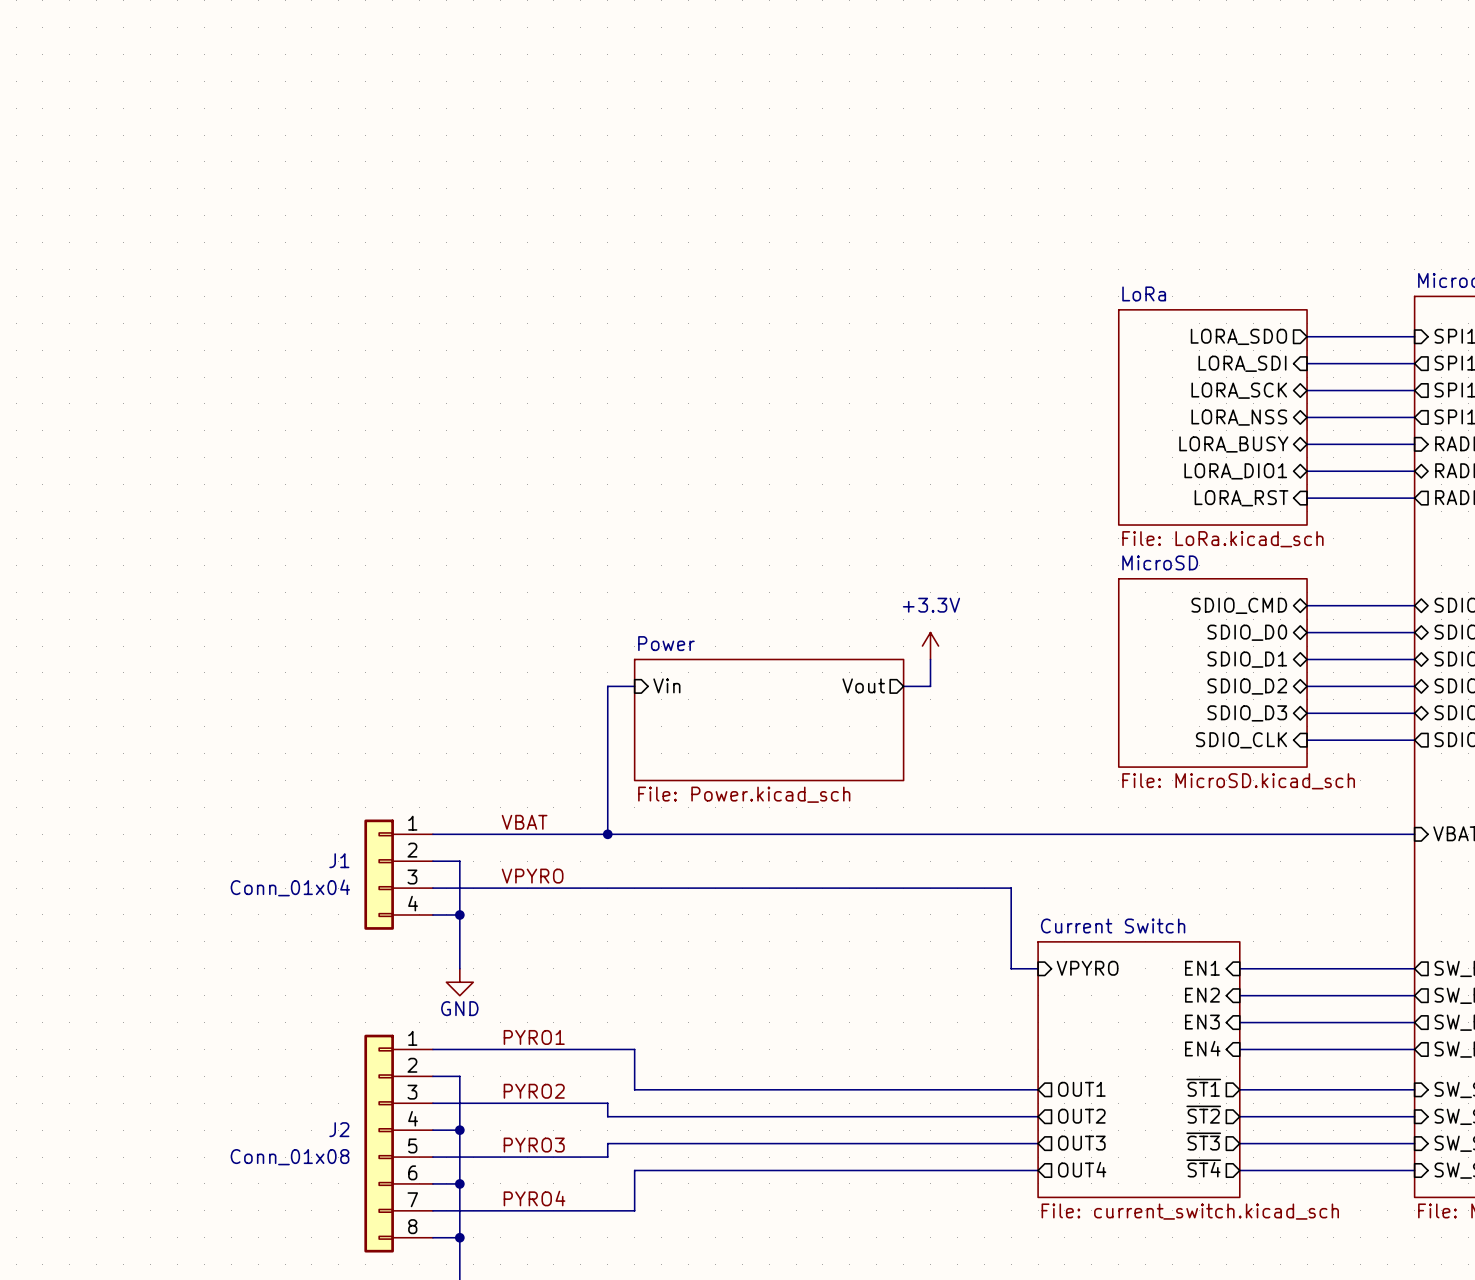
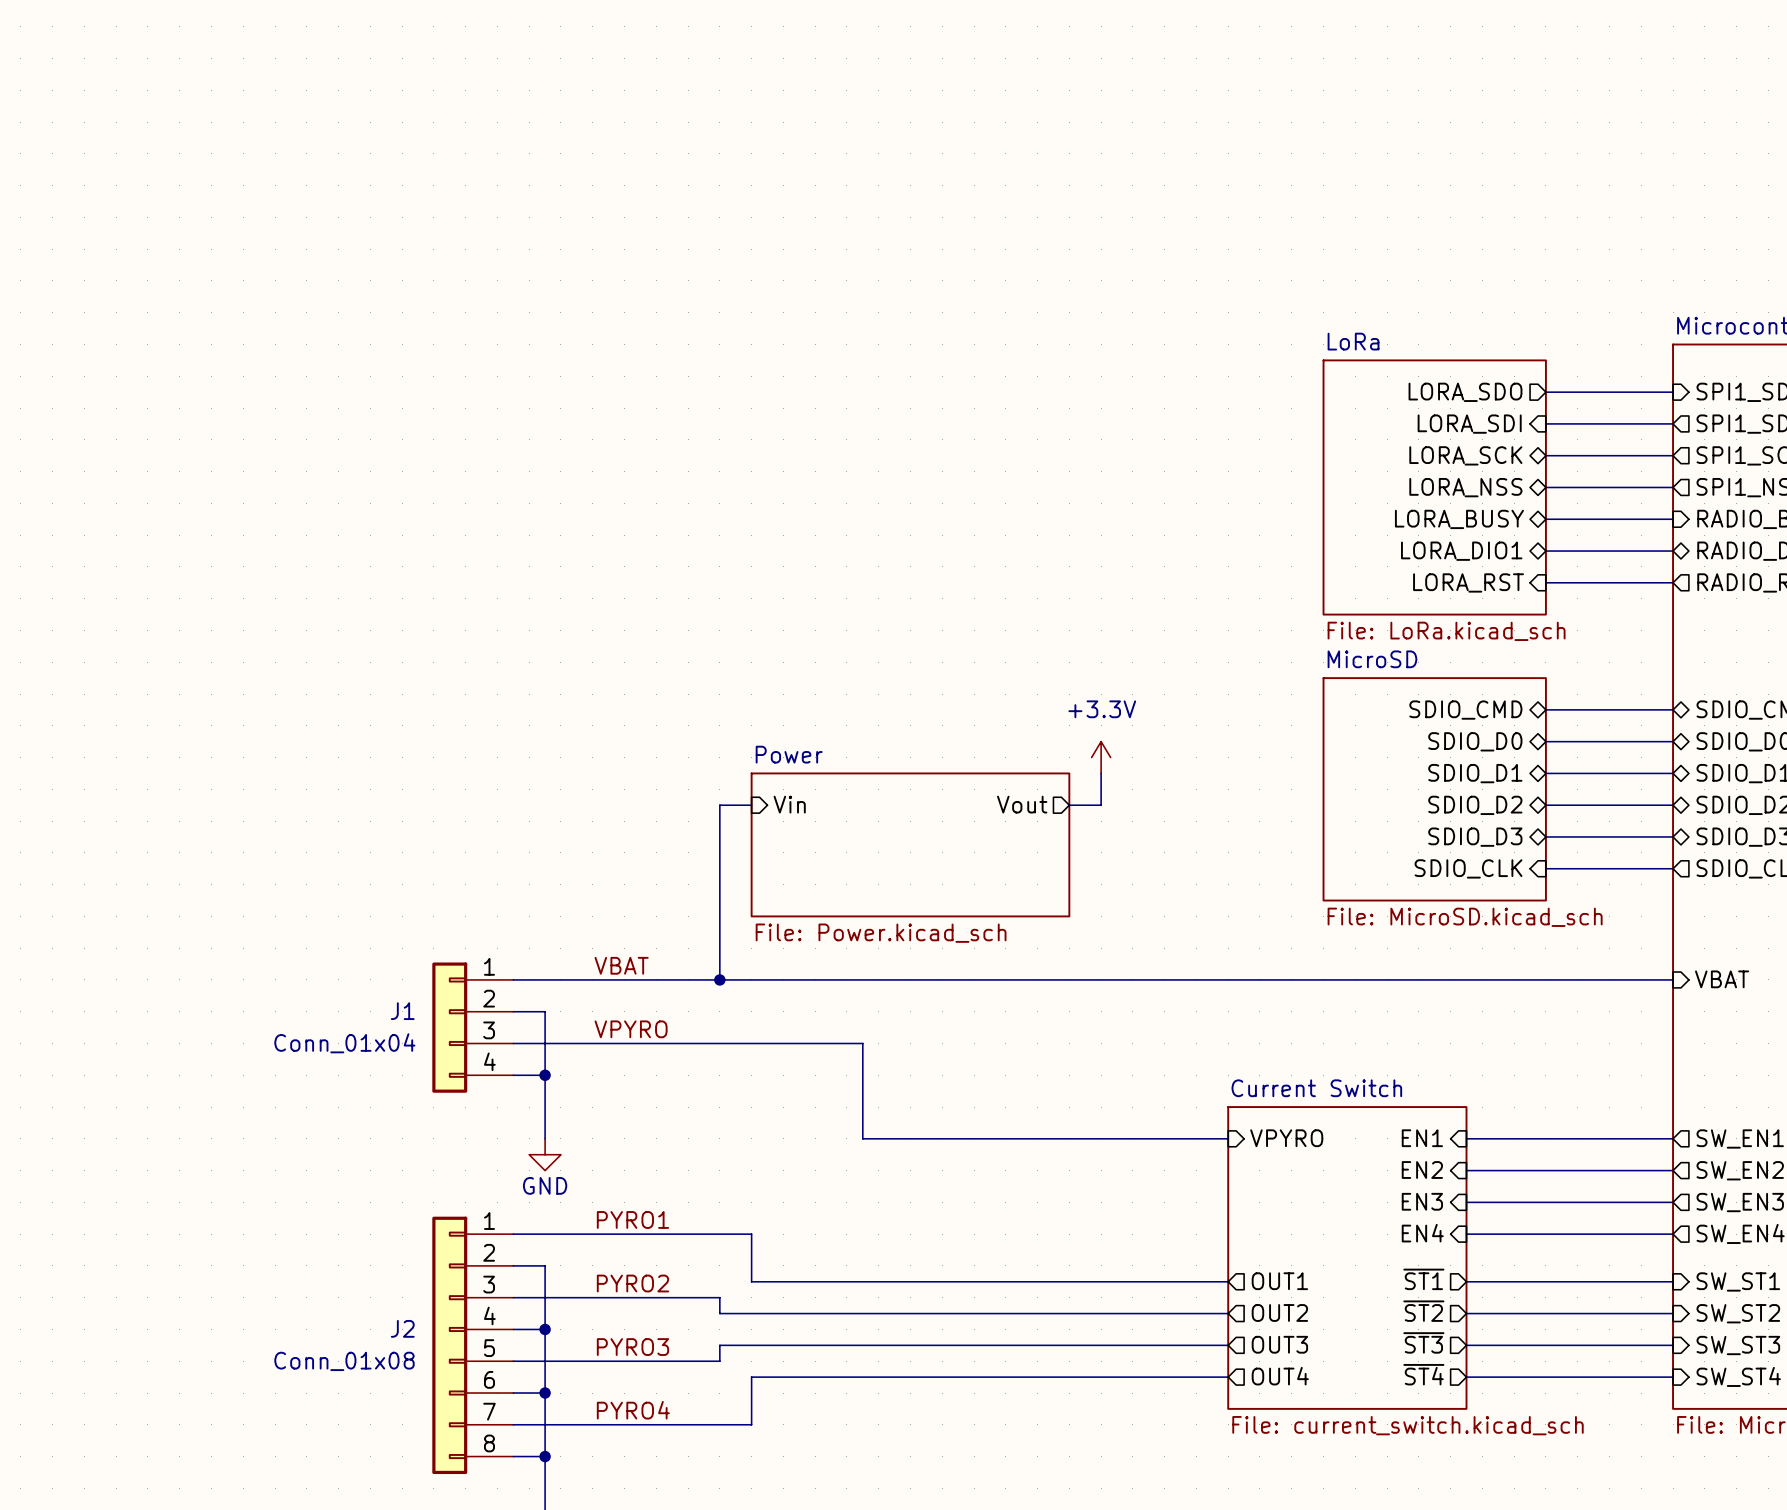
wire: (728, 888) (1011, 888) (1011, 968) -> (862, 1043) (862, 1138) (1196, 1138)

